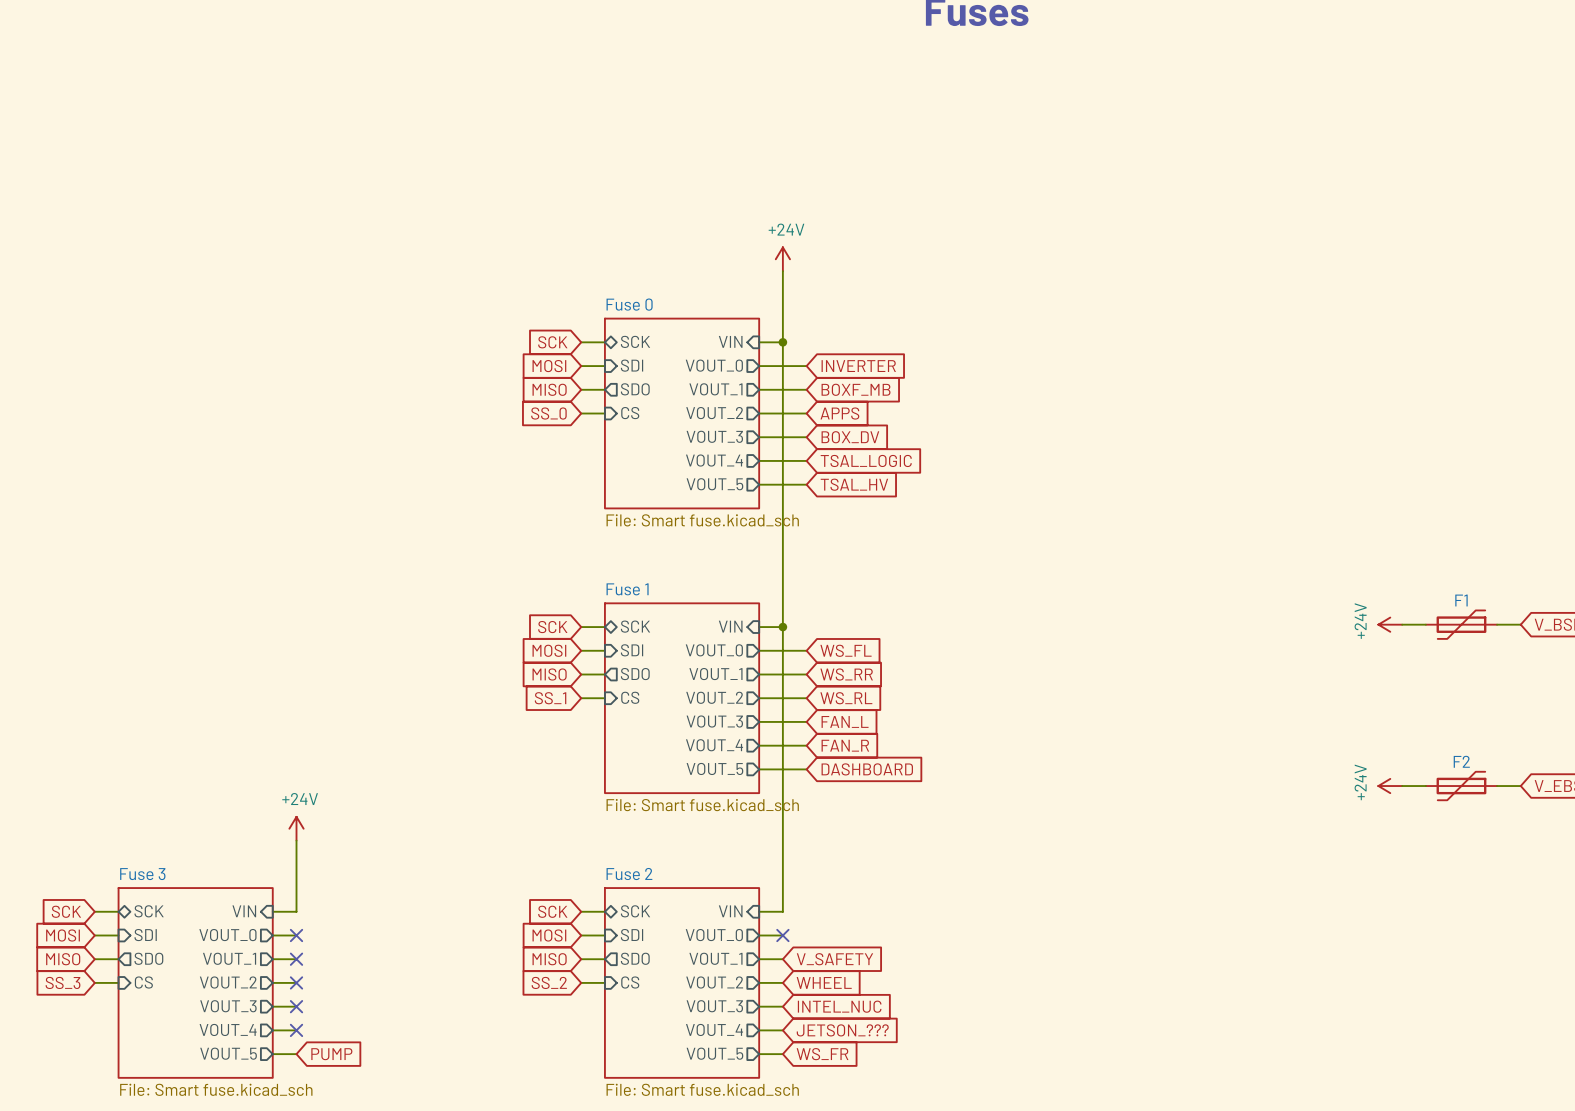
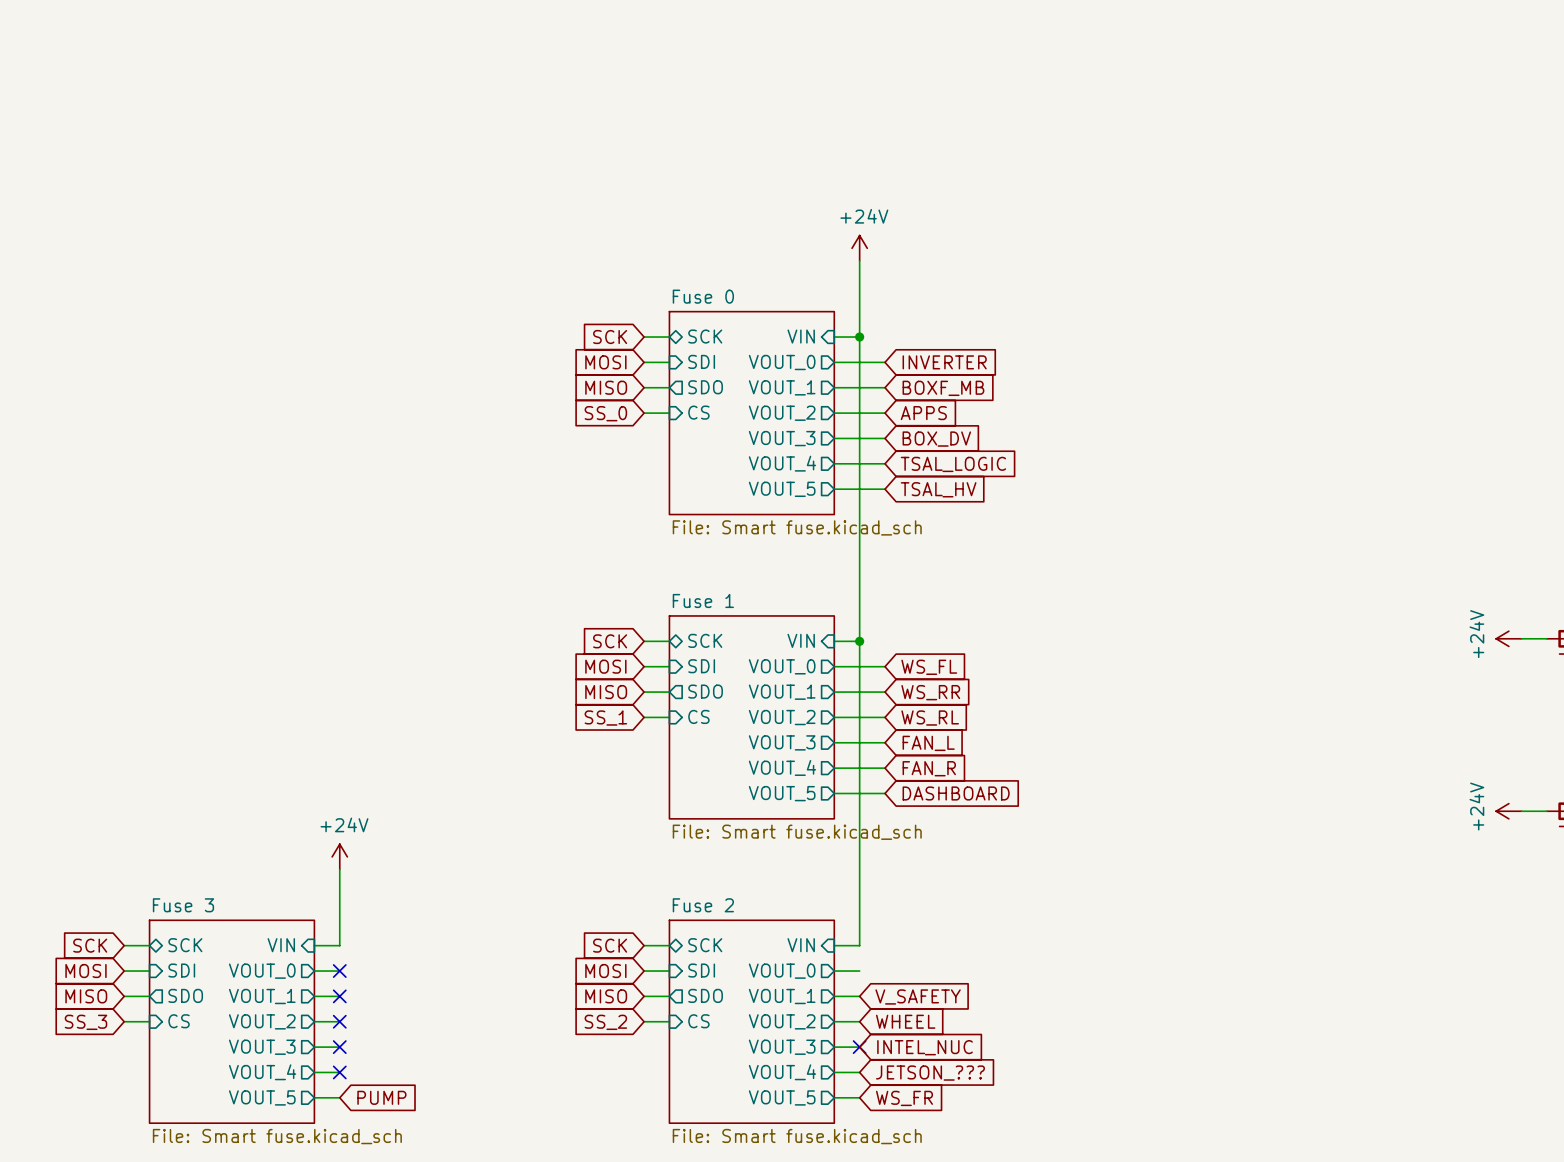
no-connect mark: (782, 935) -> none
no-connect mark: none -> (859, 1047)

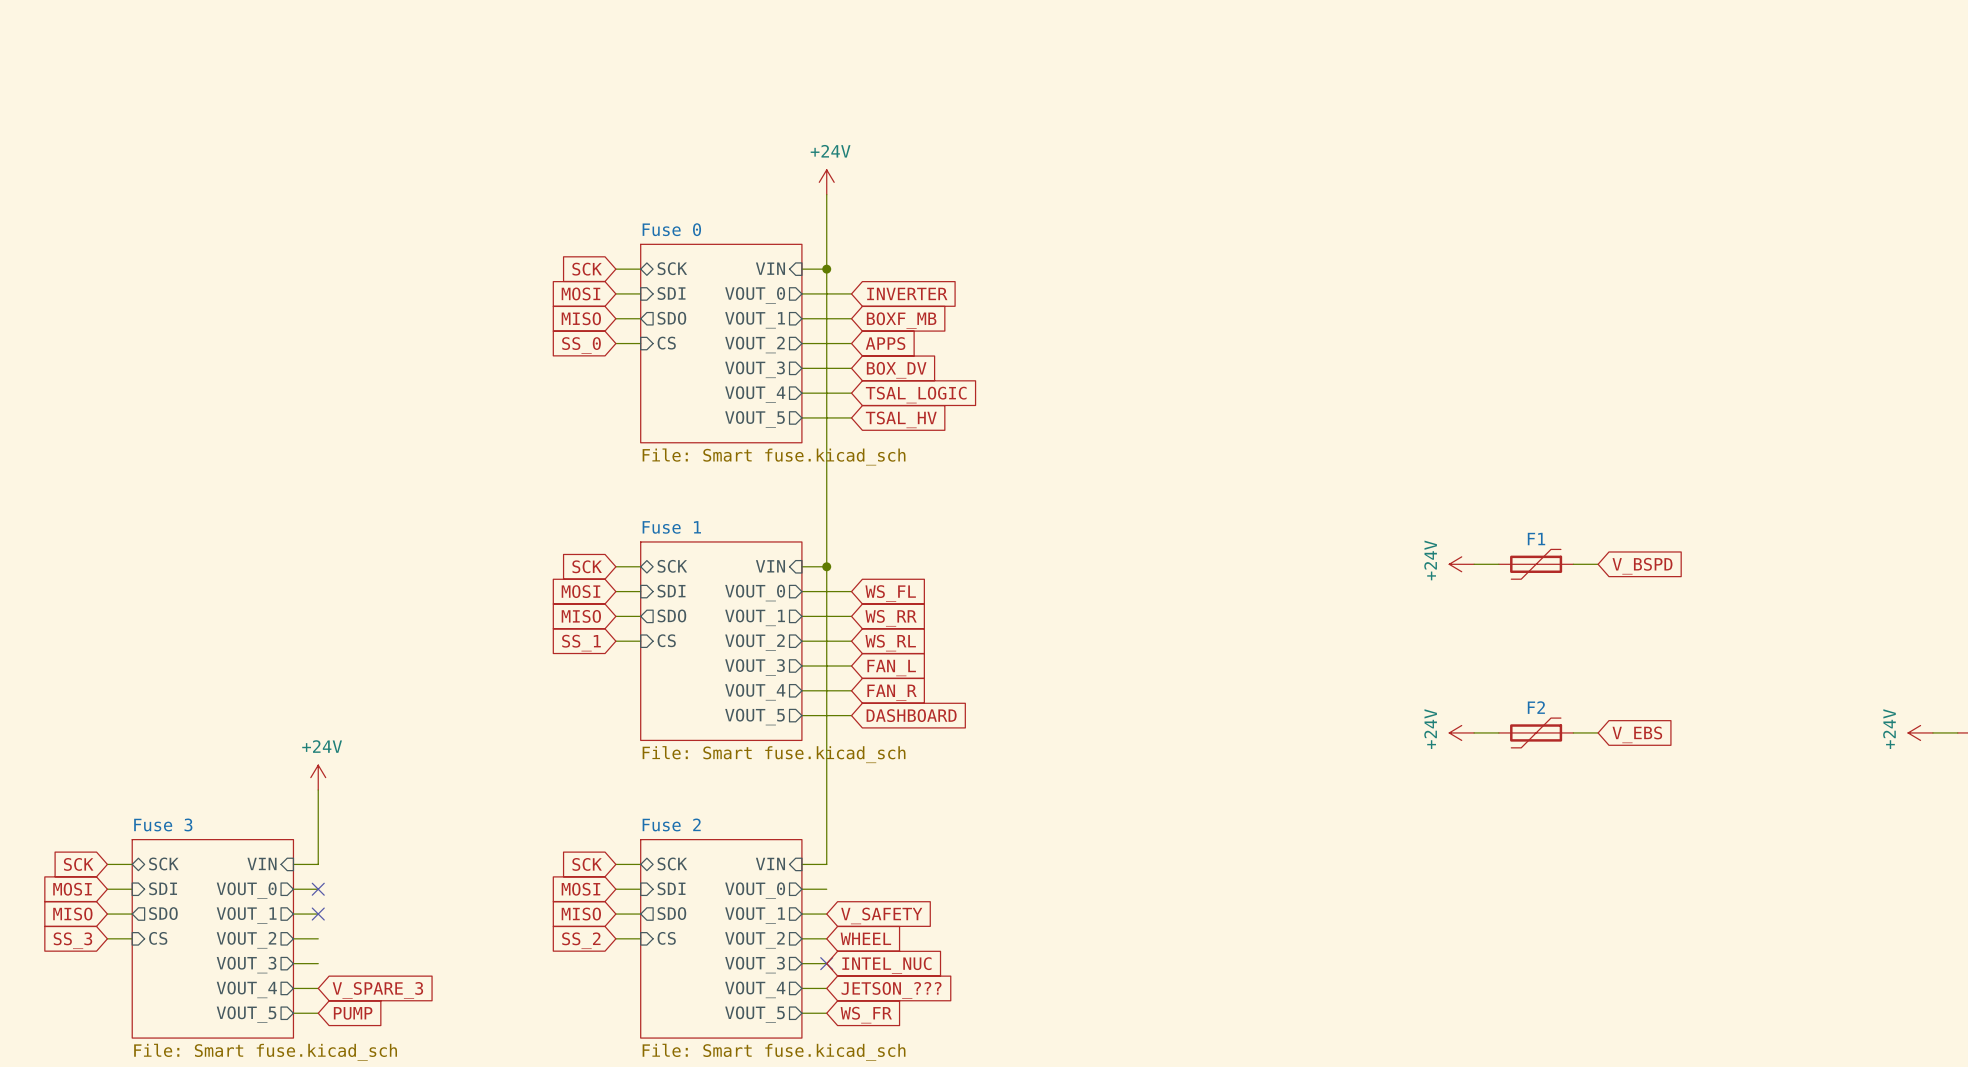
no-connect mark: (339, 1021) -> none
no-connect mark: (339, 1047) -> none
no-connect mark: (339, 1072) -> none
global label: none -> V_SPARE_3 (377, 990)

